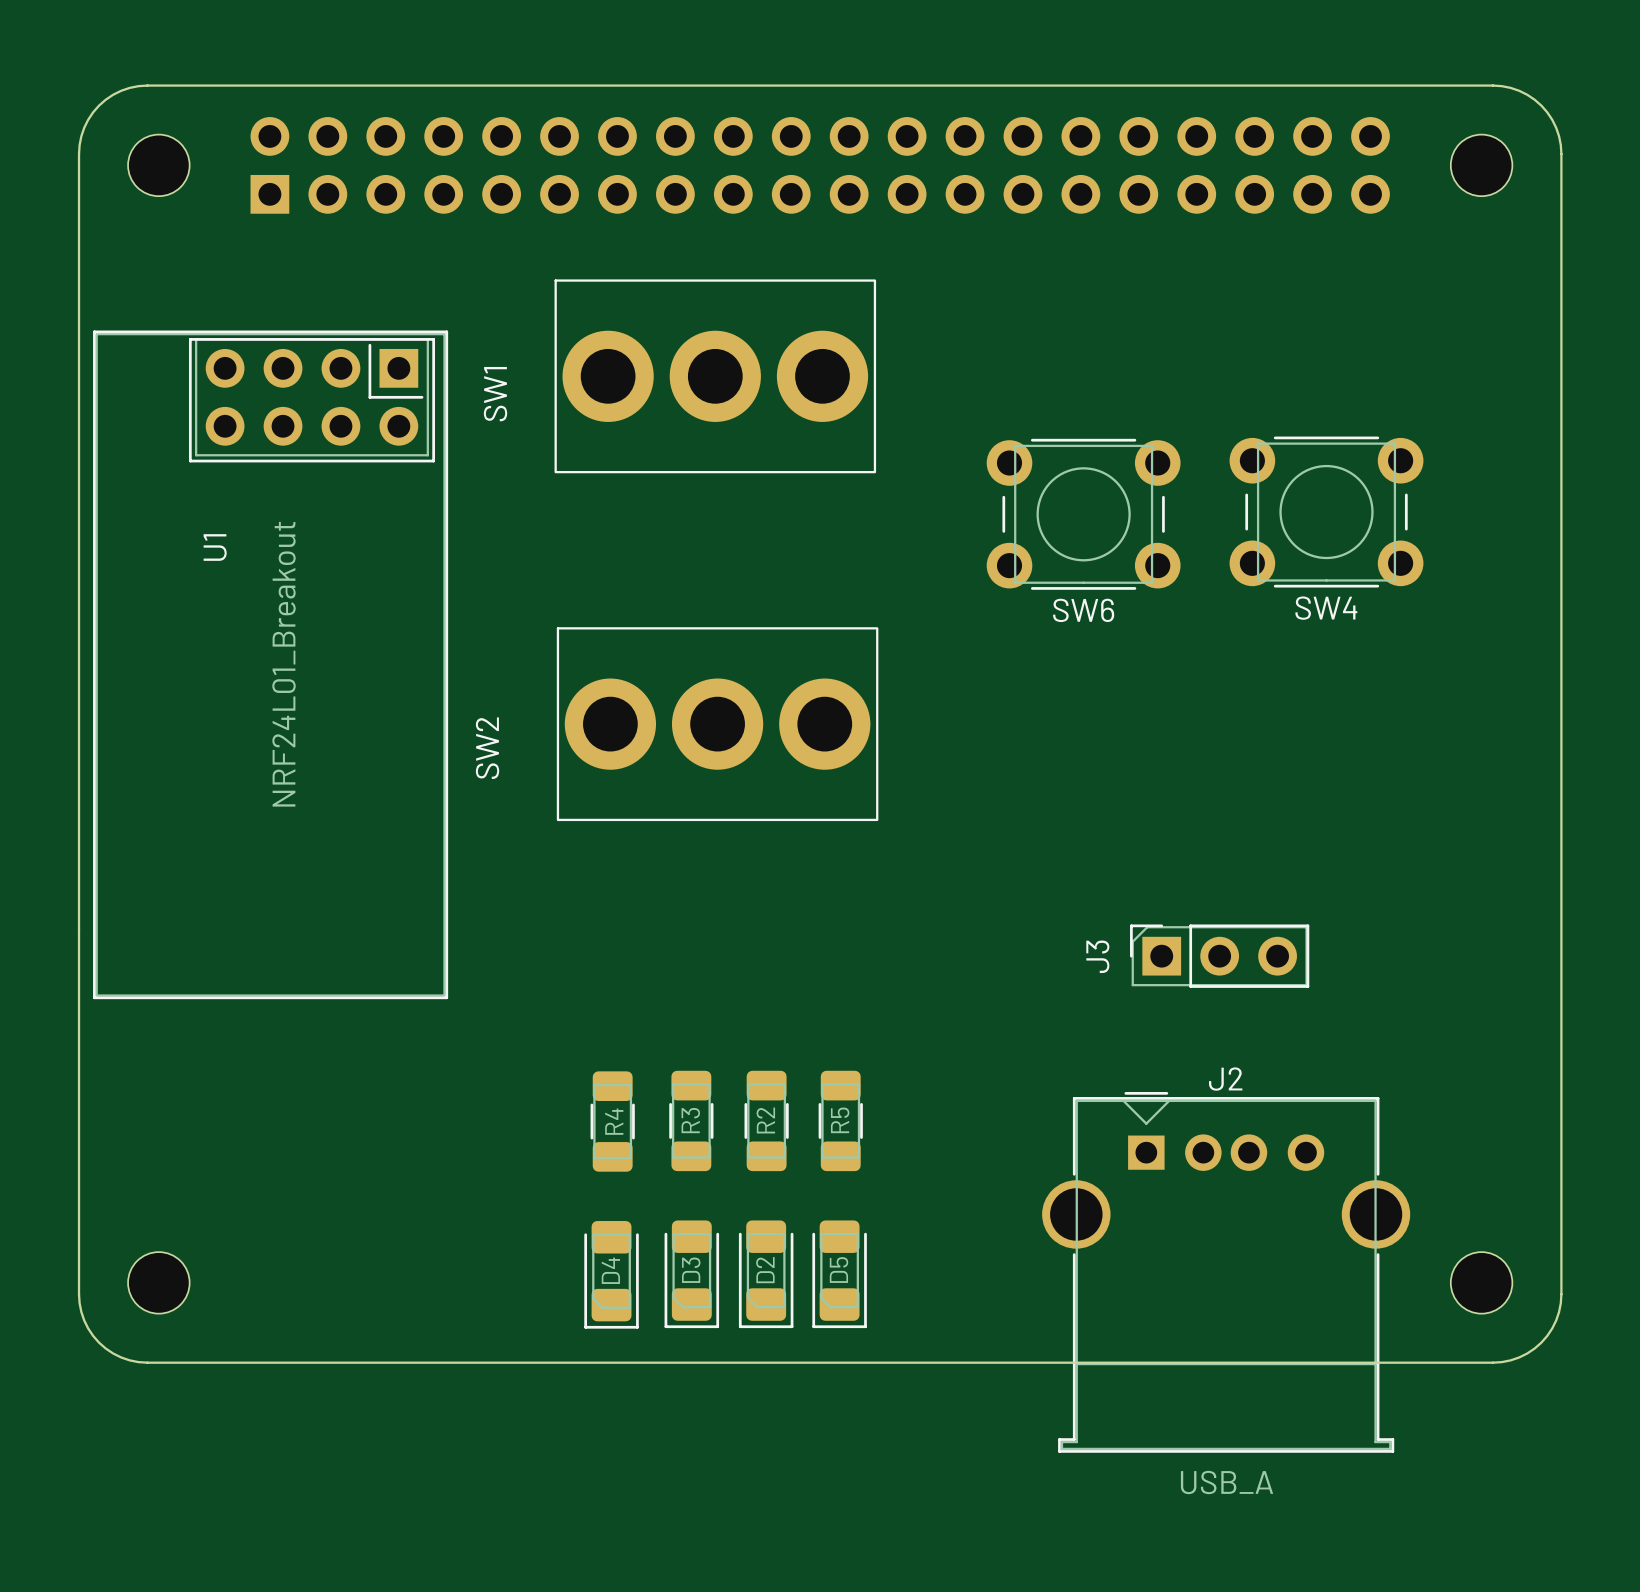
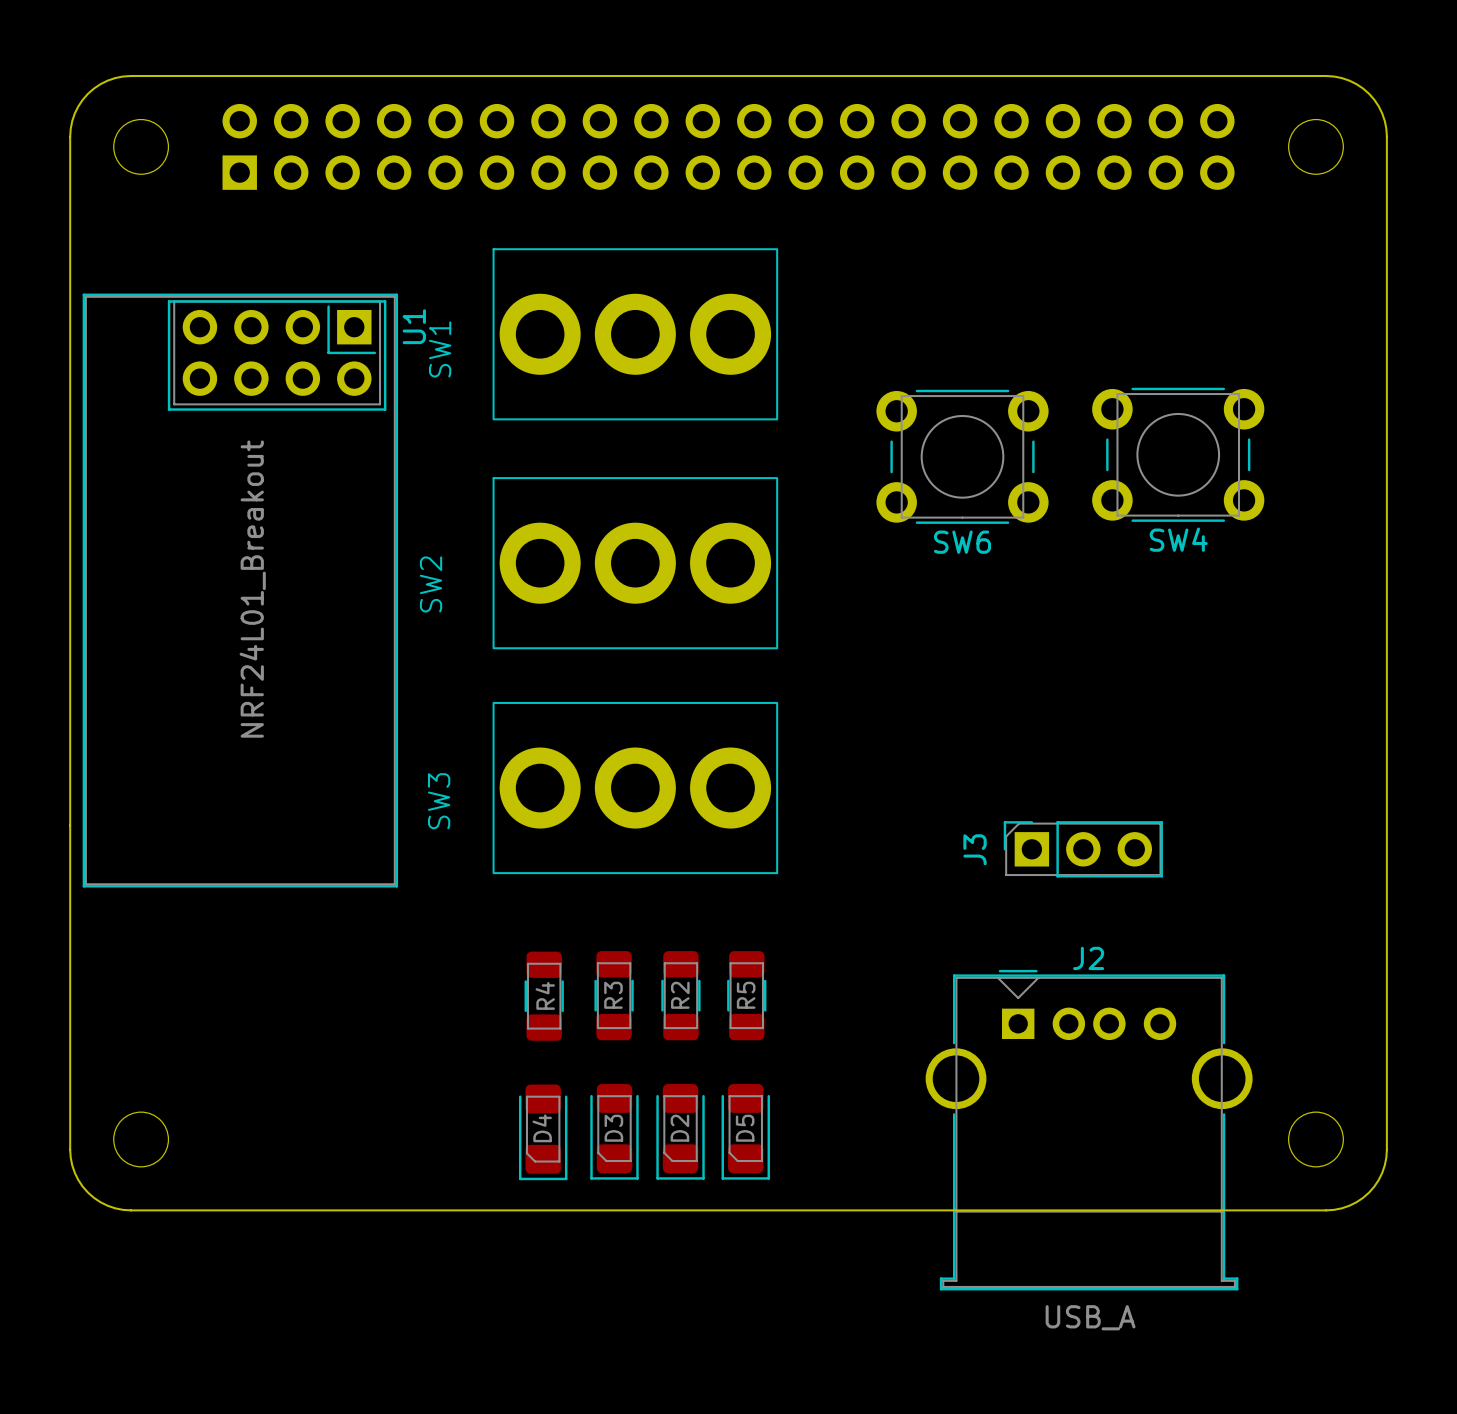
U1 name position: U1 (215, 547) -> U1 (414, 326)
SW2 position: (717, 724) -> (635, 563)
SW3: none -> (635, 788)

